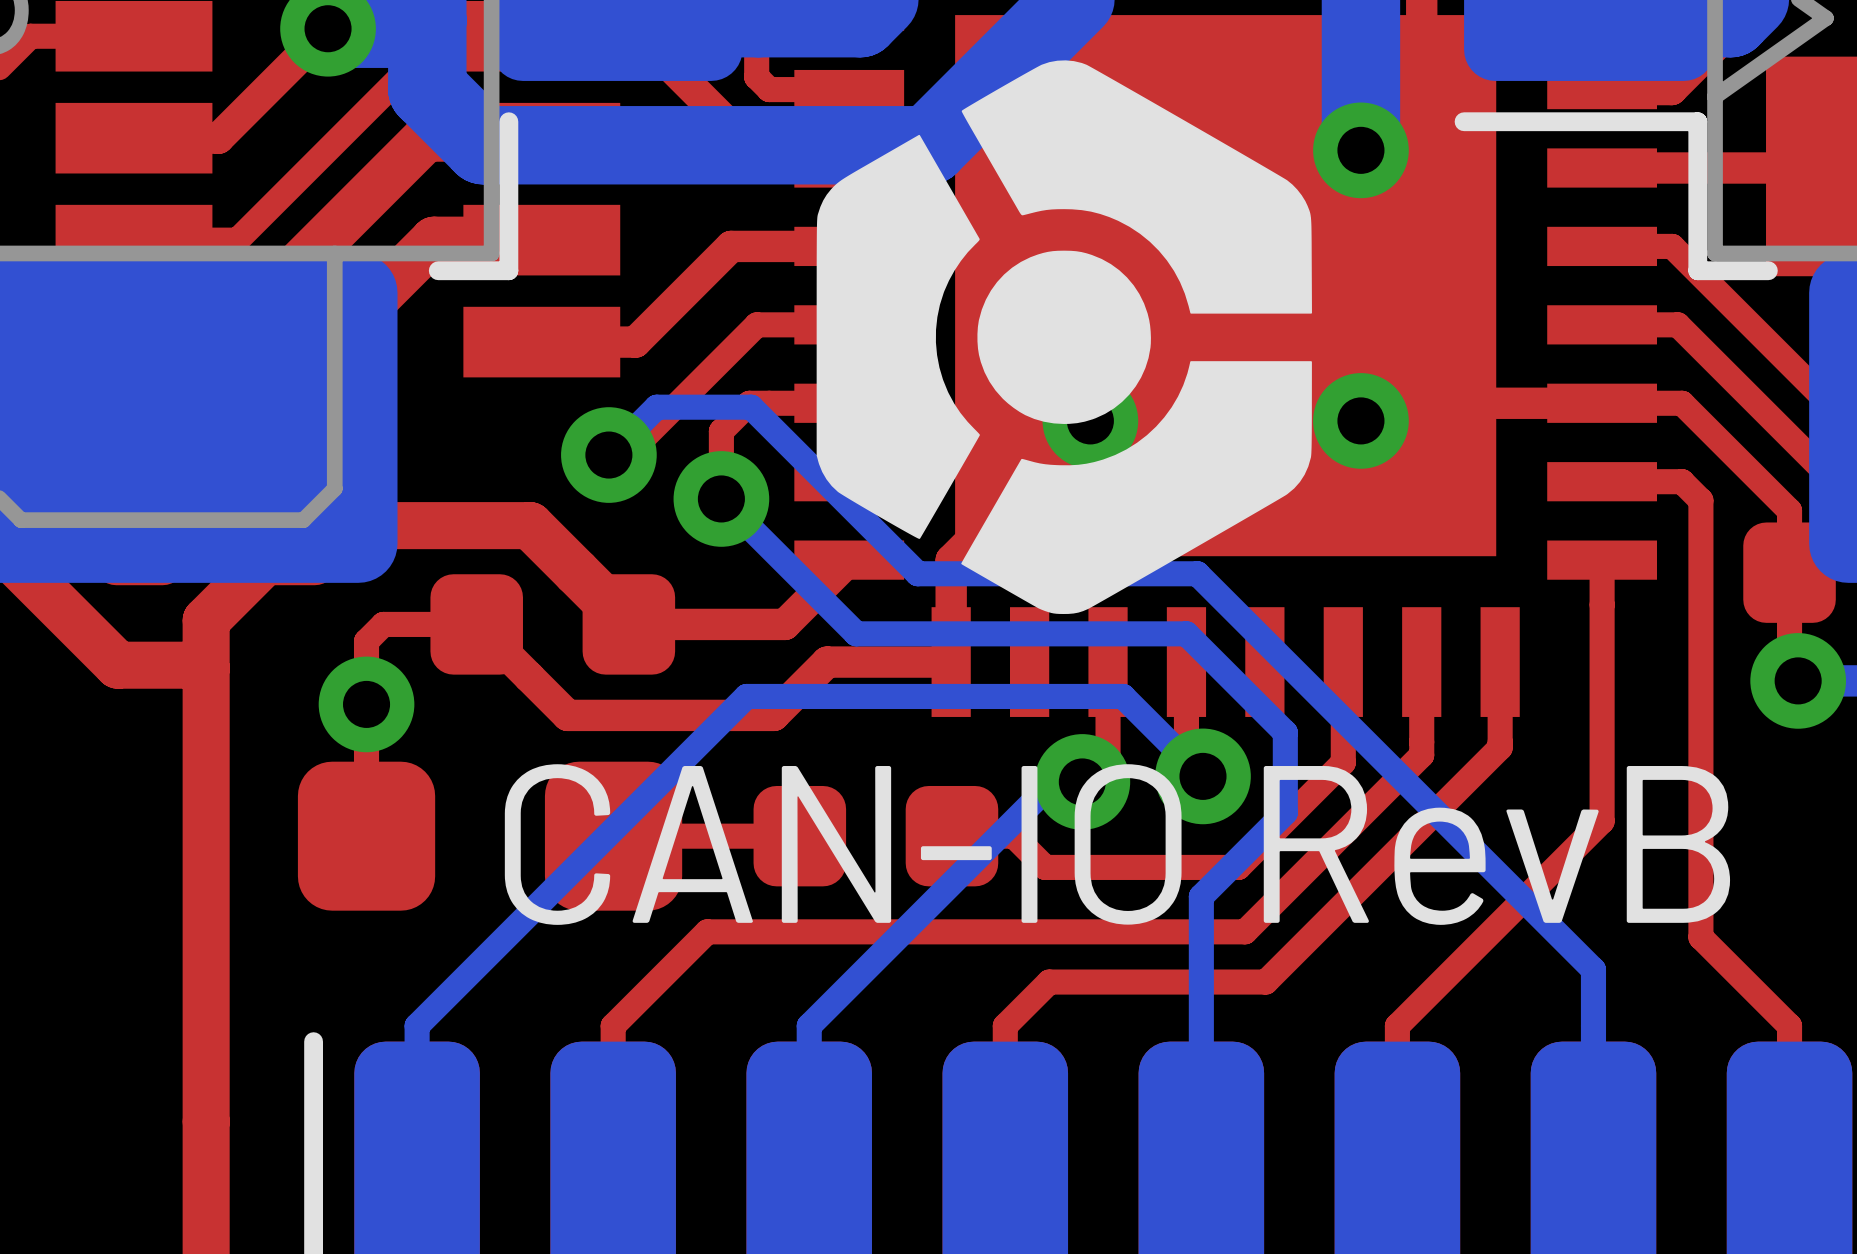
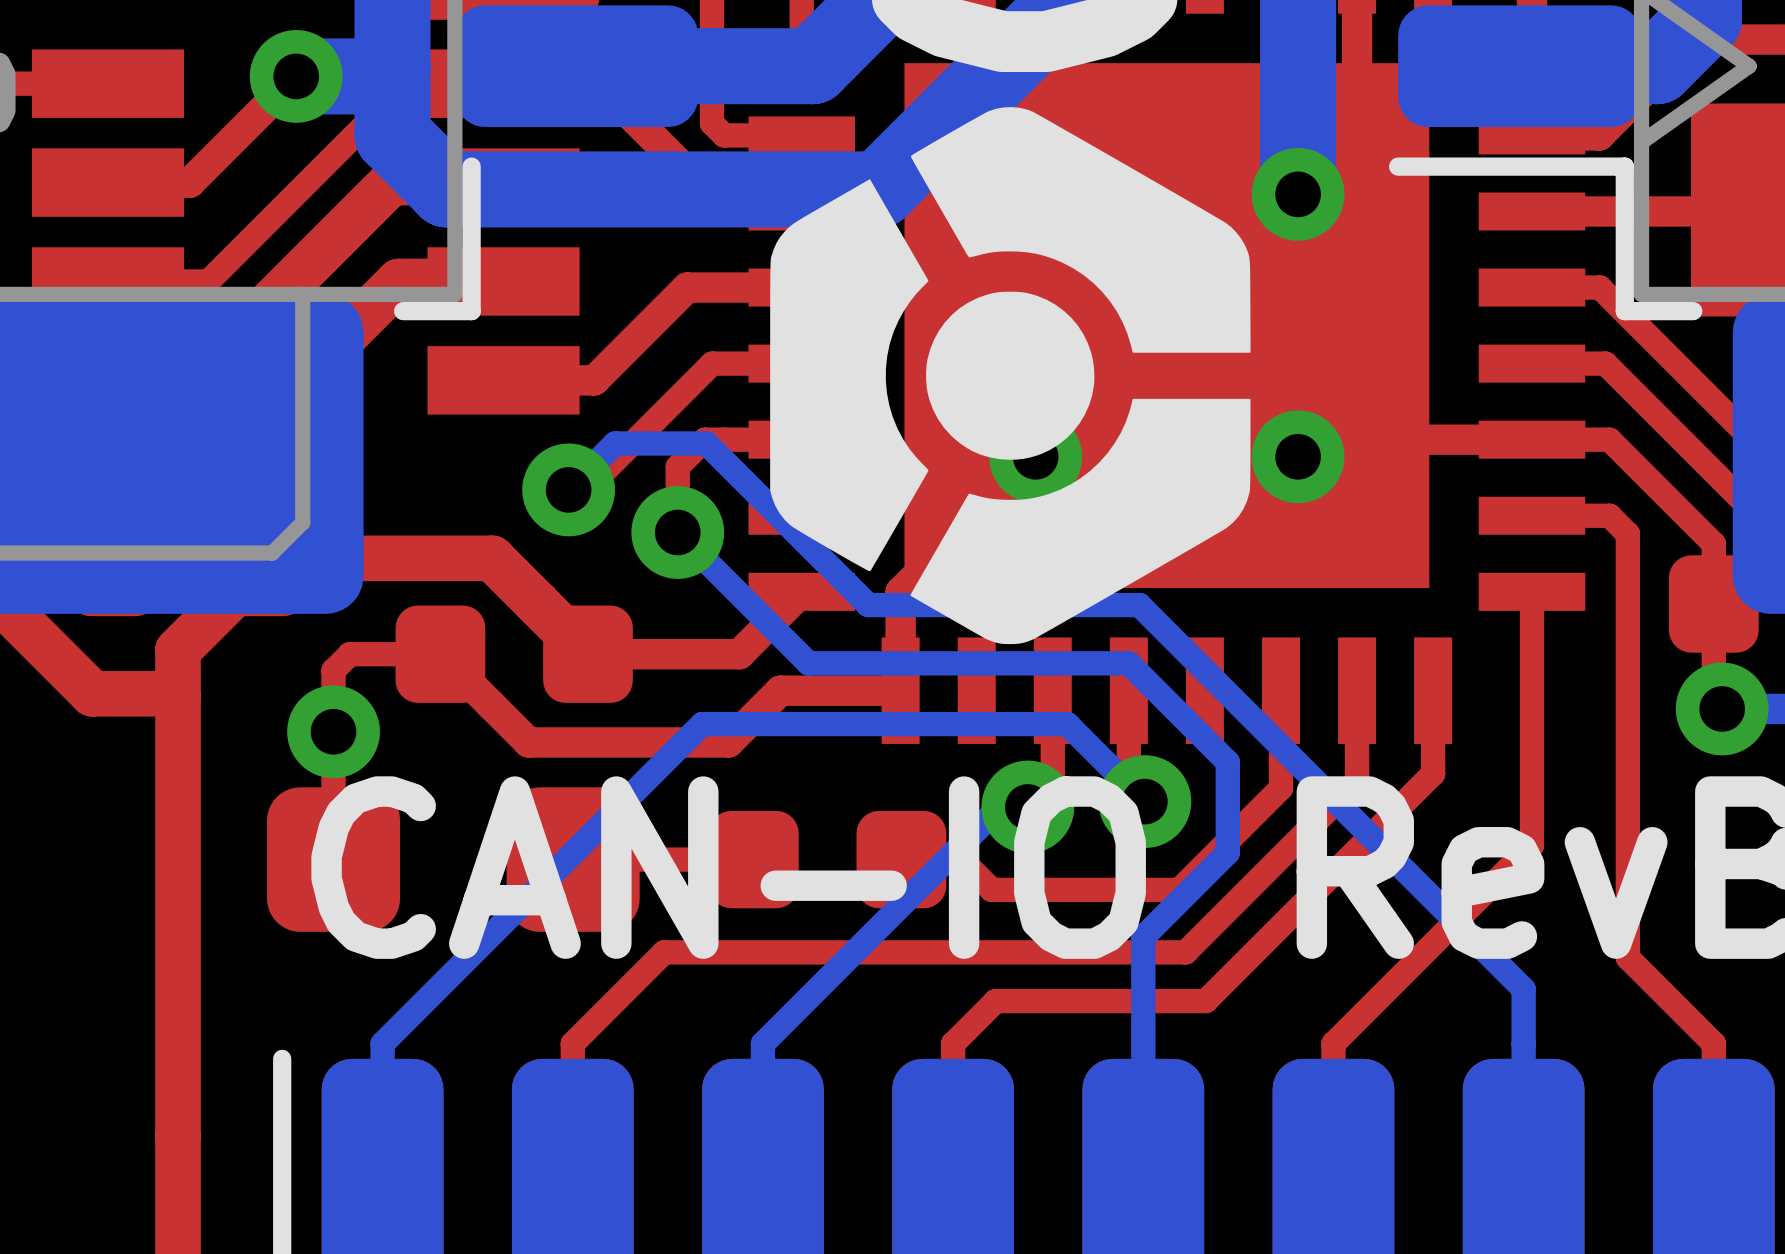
bottom track: (1285, 732) (1285, 812) (1201, 896) (1201, 916) -> (1224, 759) (1227, 762) (1227, 852) (1143, 937)

